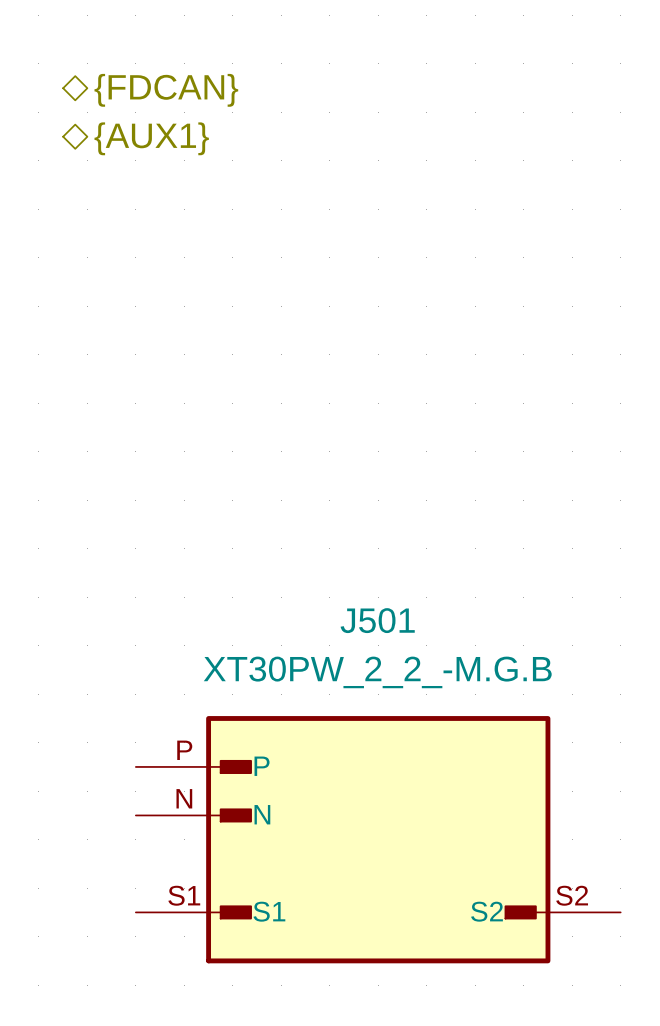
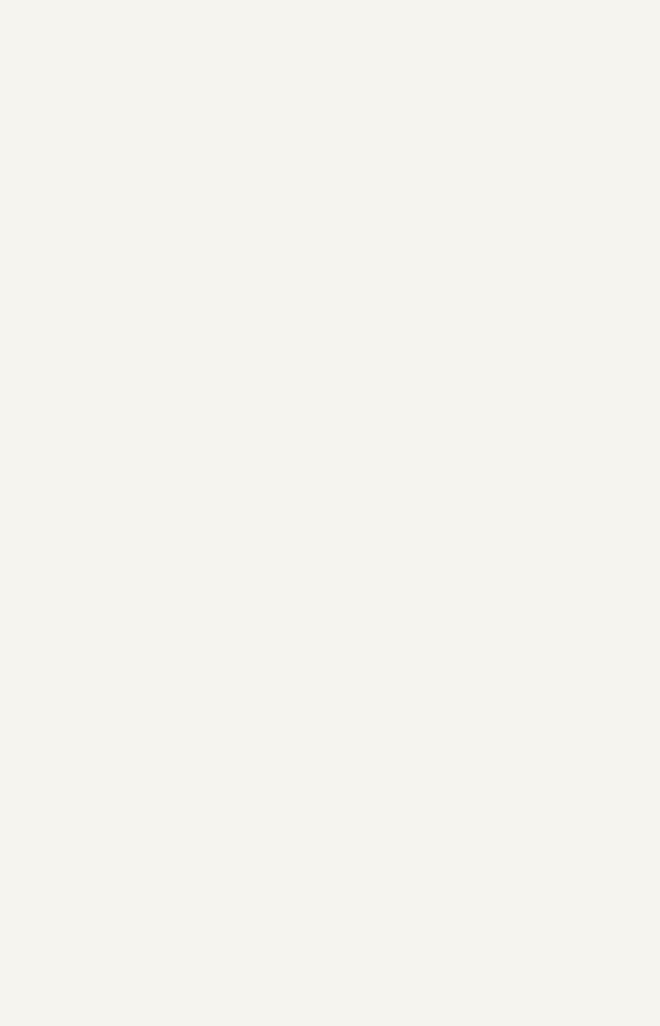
hierarchical label: {FDCAN} (166, 90) -> none
hierarchical label: {AUX1} (151, 138) -> none
J501: XT30PW_2_2_-M.G.B (378, 839) -> none

